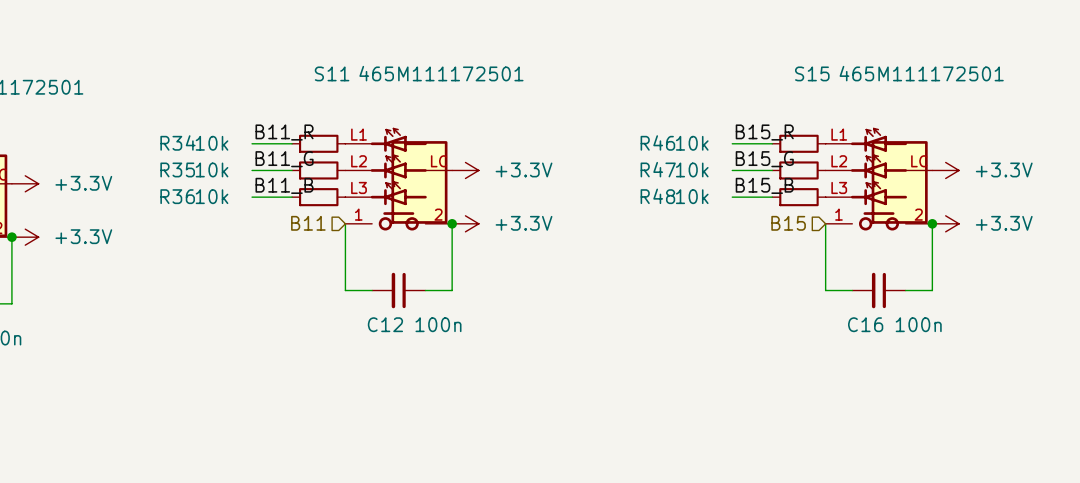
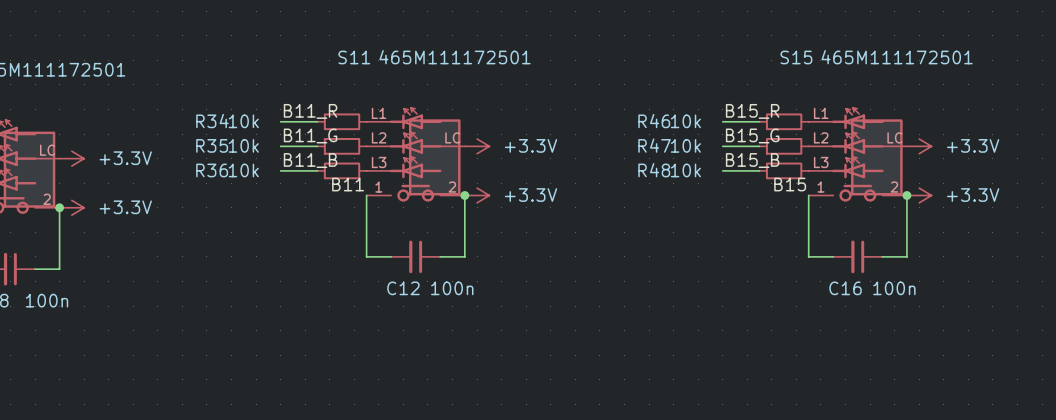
label: none -> B11 (348, 184)
label: none -> B15 (790, 184)
hierarchical label: B11 (308, 223) -> none
hierarchical label: B15 (788, 223) -> none

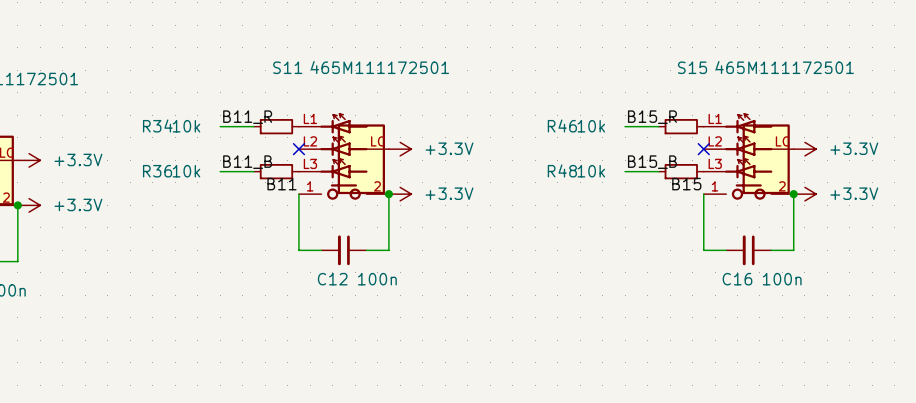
label: B11_G (310, 135) -> none
label: B15_G (752, 135) -> none
wire: (280, 146) (317, 146) -> none
R35: 10k (342, 146) -> none
no-connect mark: none -> (298, 149)
wire: (722, 146) (759, 146) -> none
R47: 10k (784, 146) -> none
no-connect mark: none -> (703, 149)

